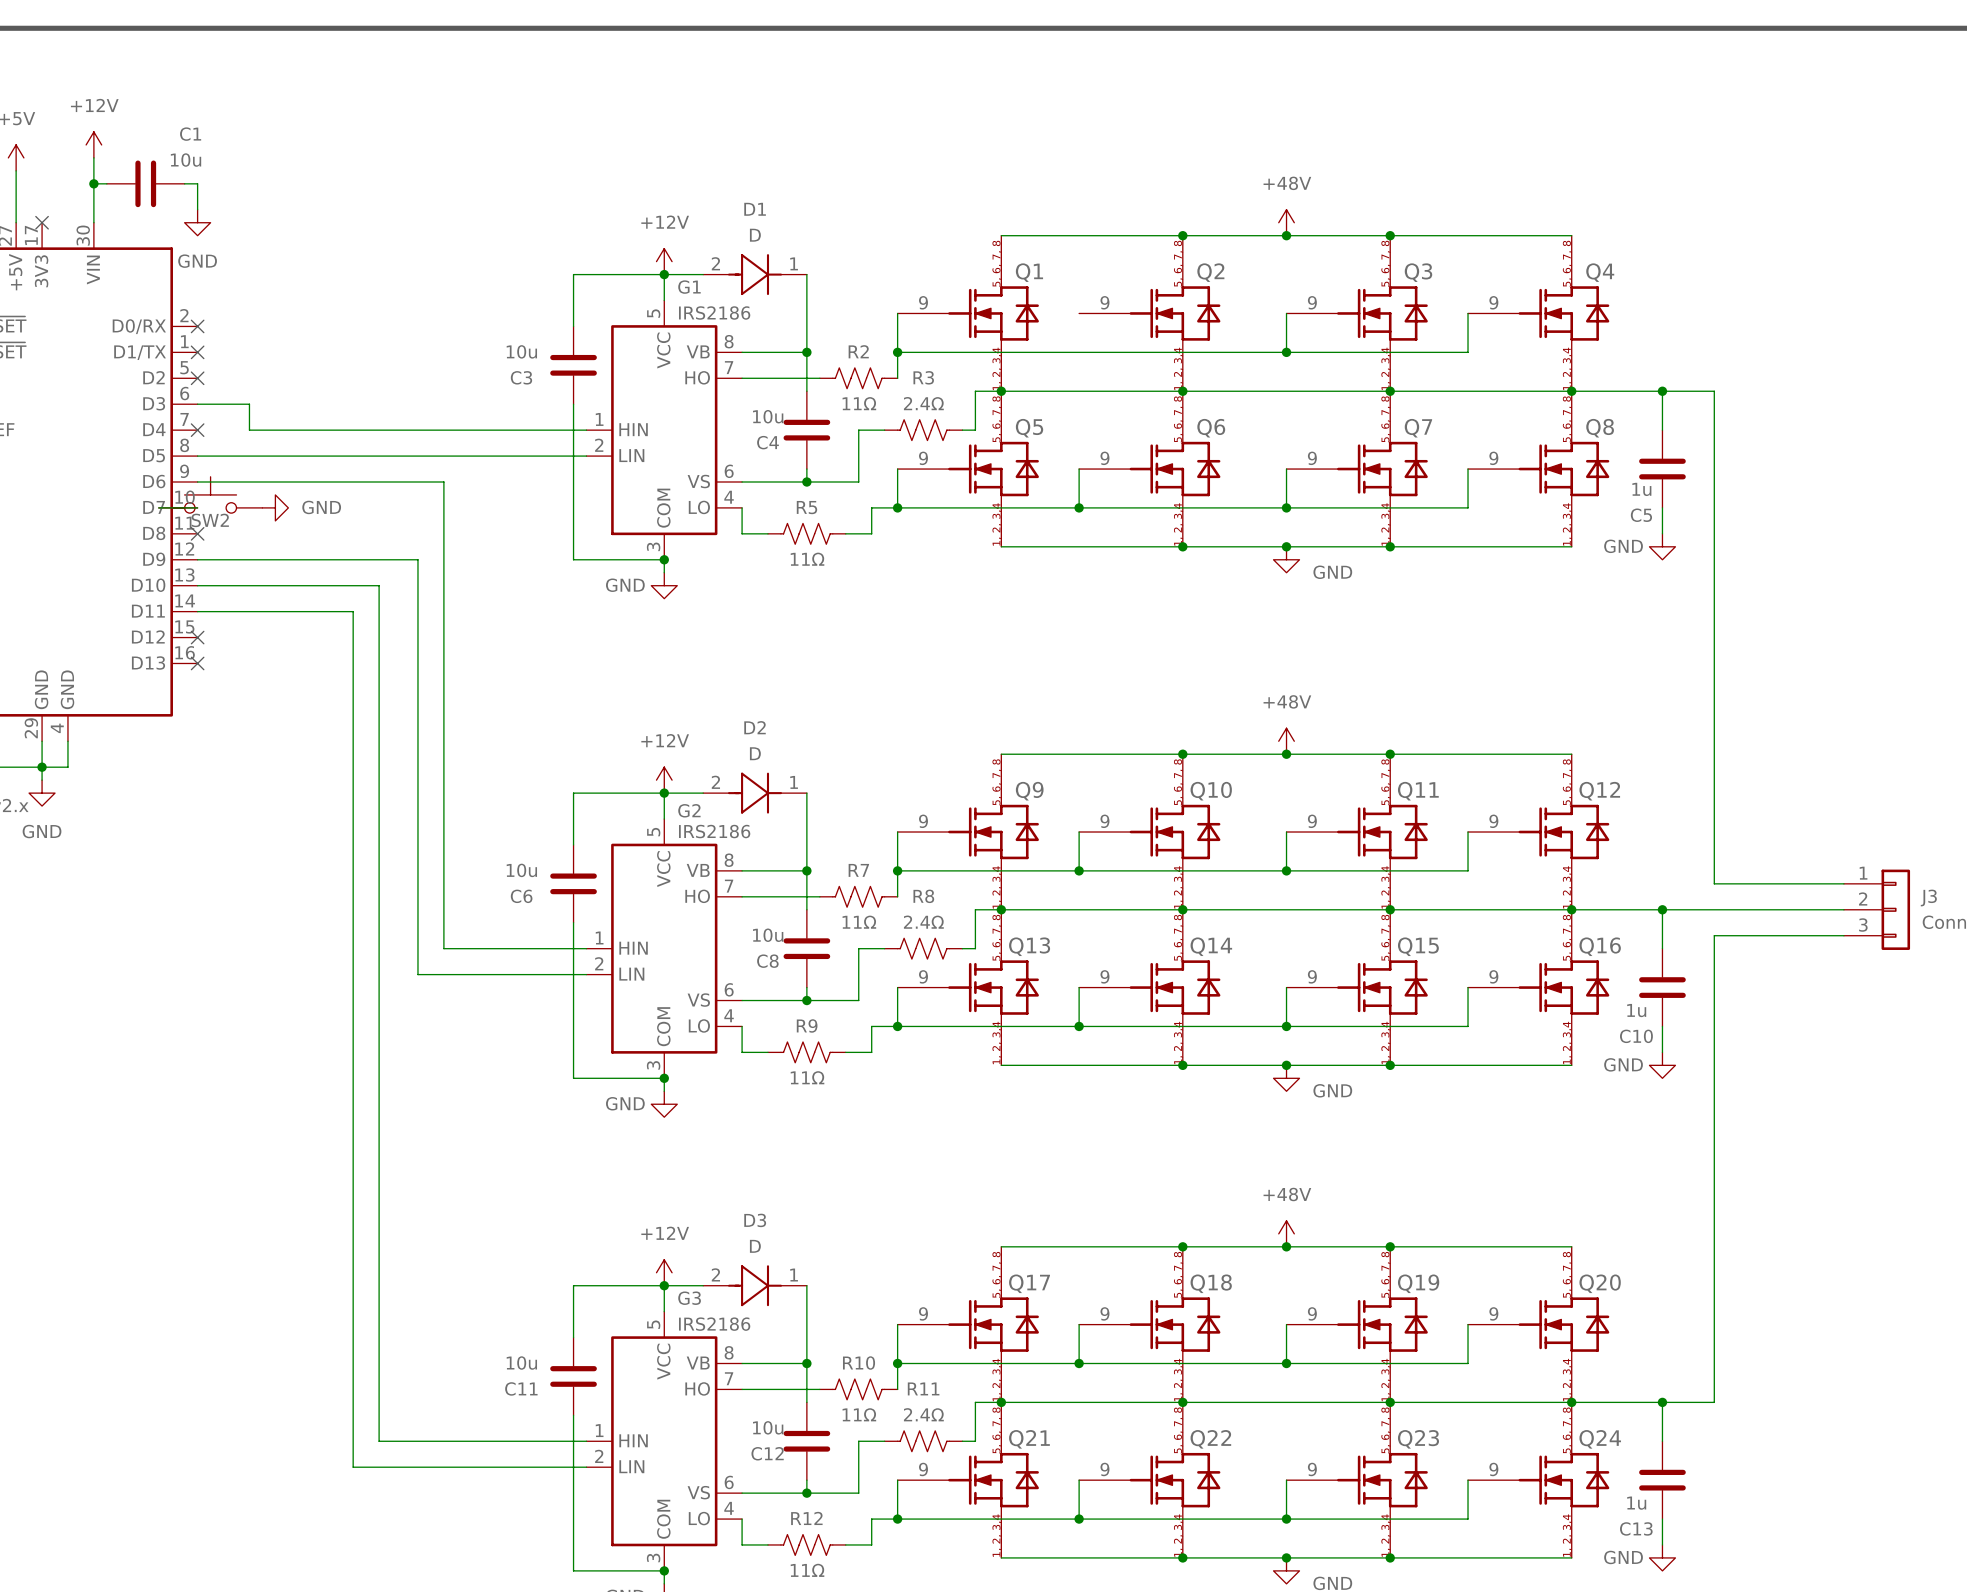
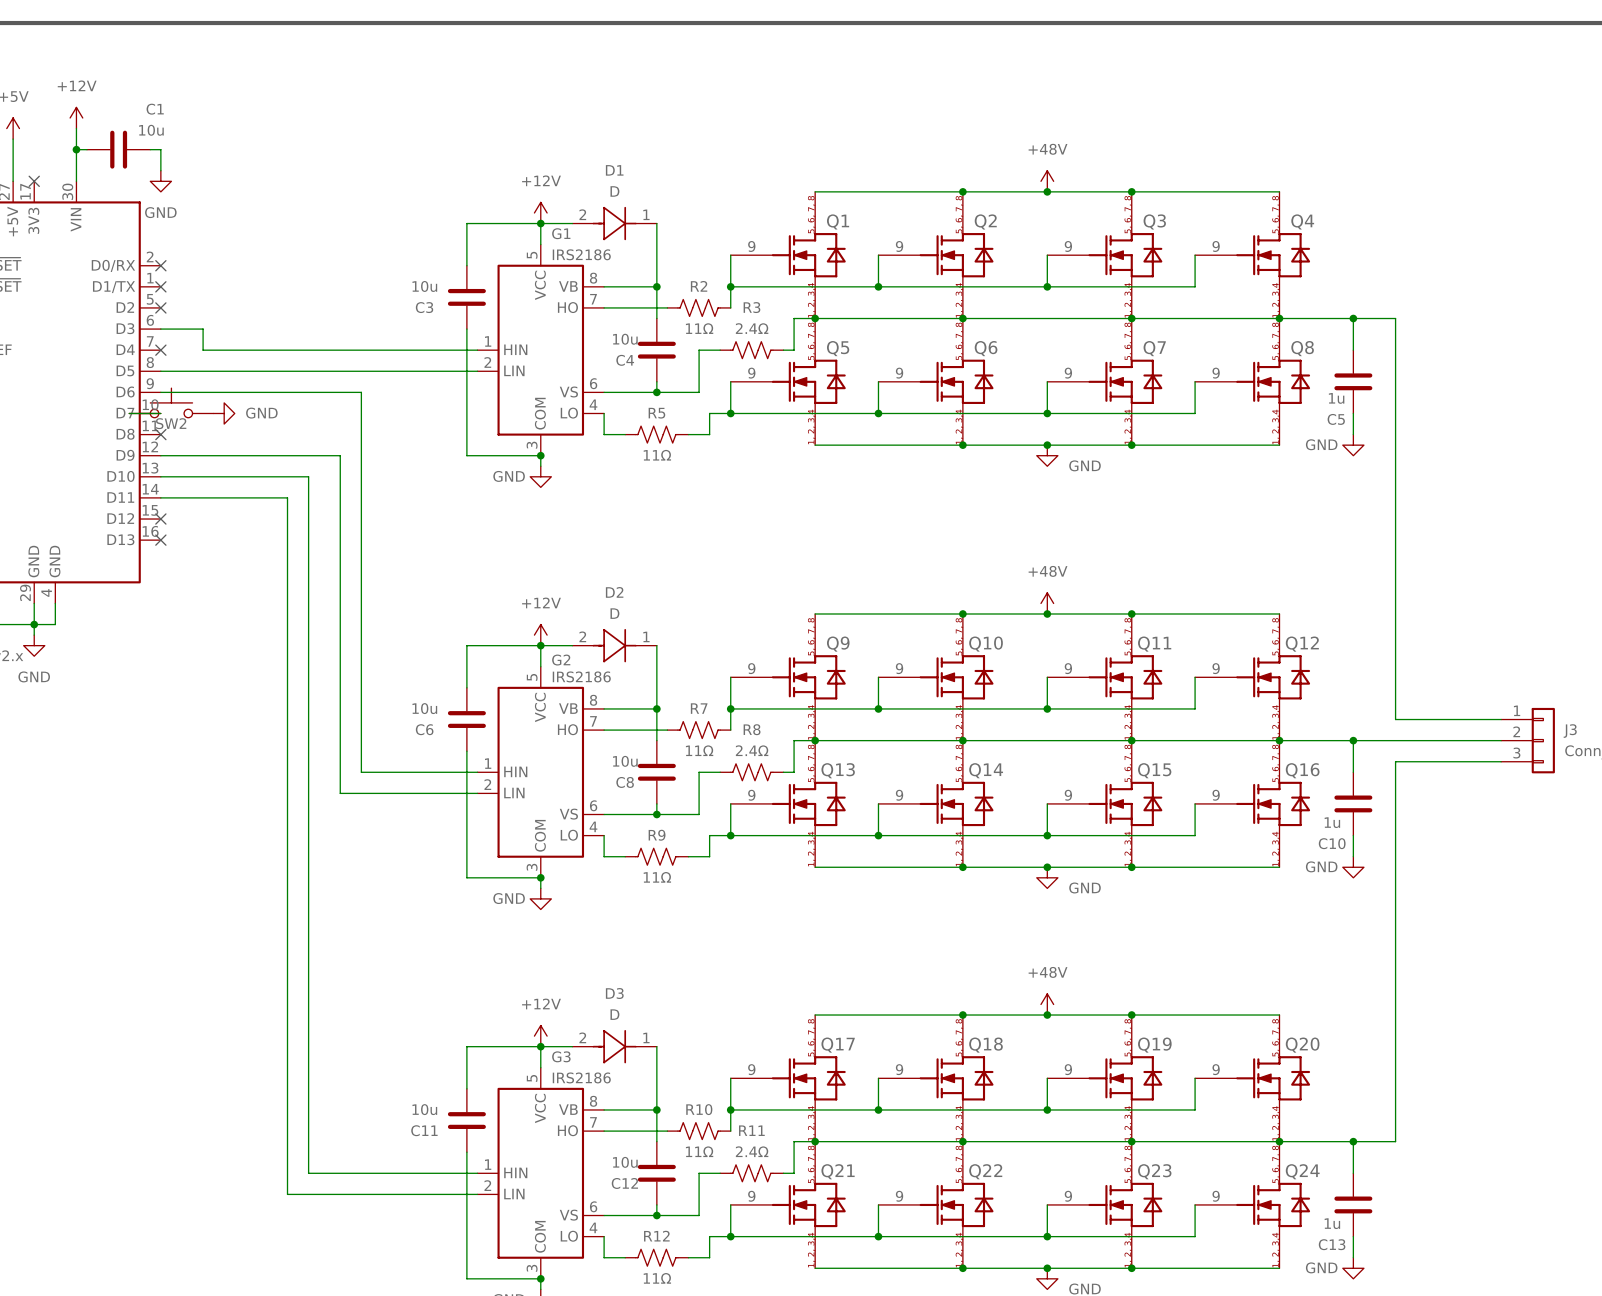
wire: none -> (878, 255) (878, 286)
junction: none -> (878, 286)

